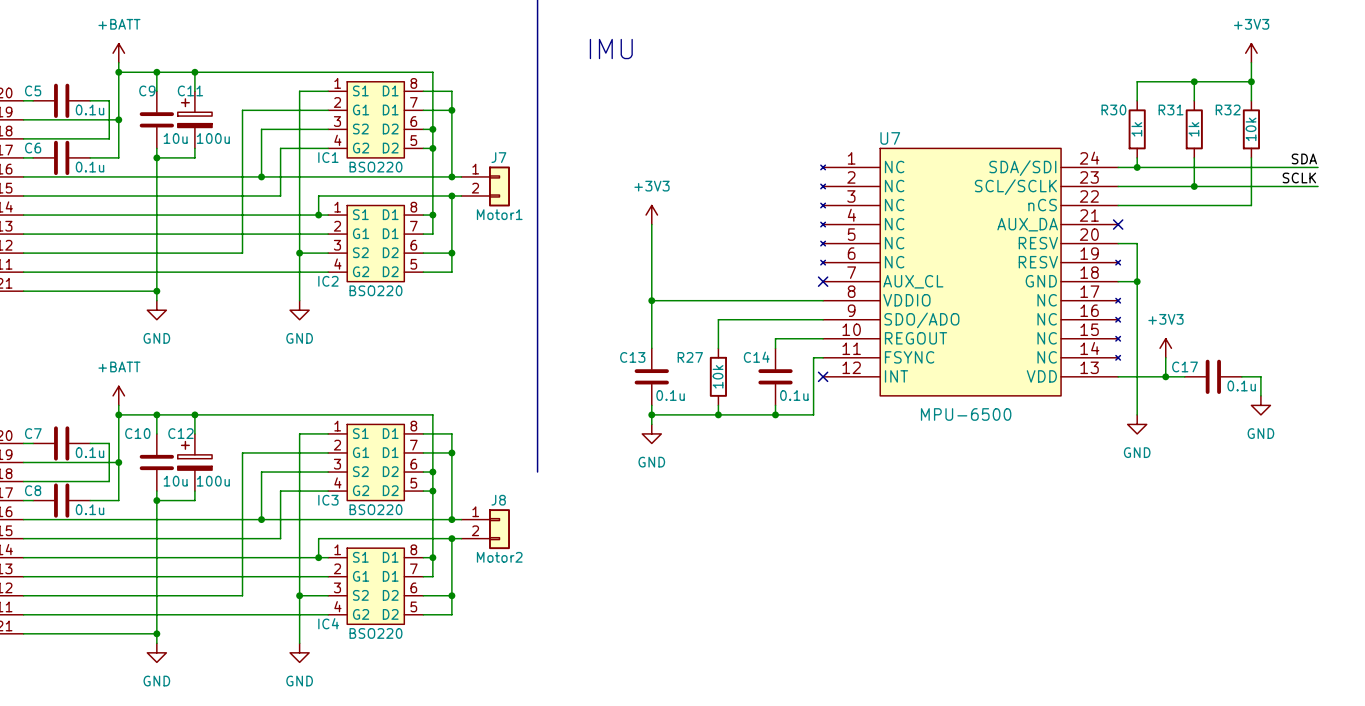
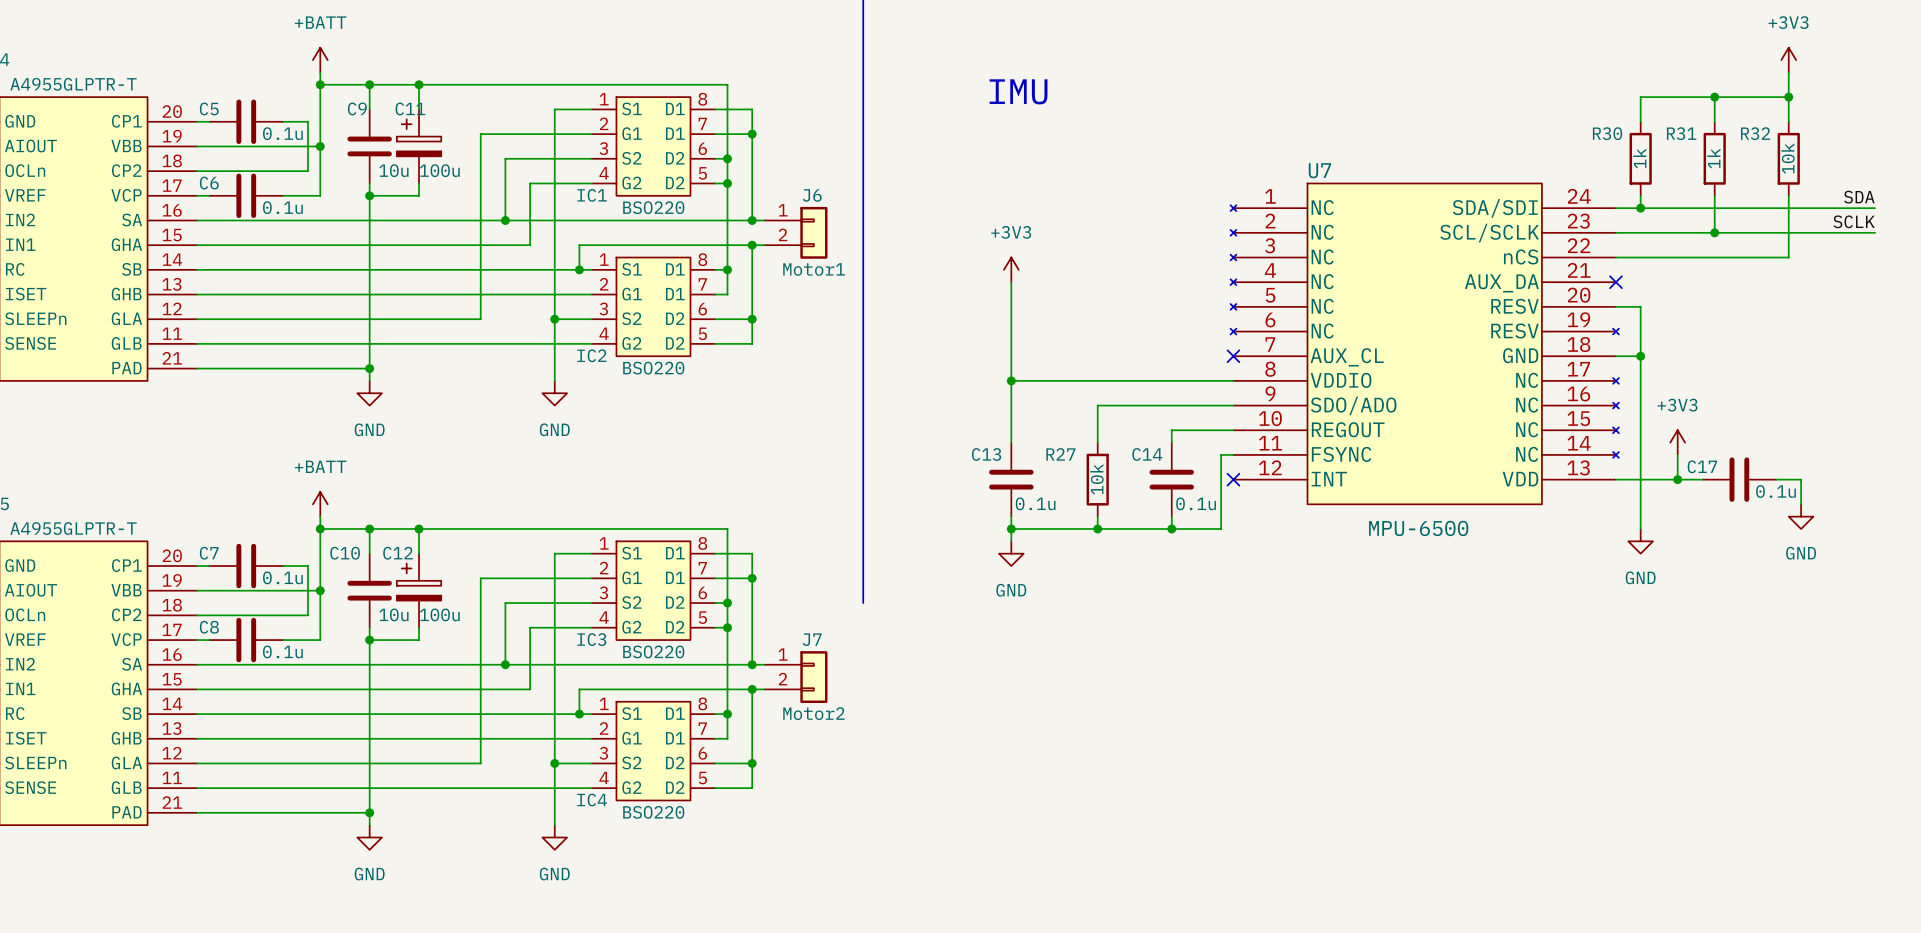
text position: IMU (611, 49) -> IMU (1018, 91)
J7 name: J7 (498, 157) -> J6 (812, 195)
J8 name: J8 (498, 500) -> J7 (812, 639)

